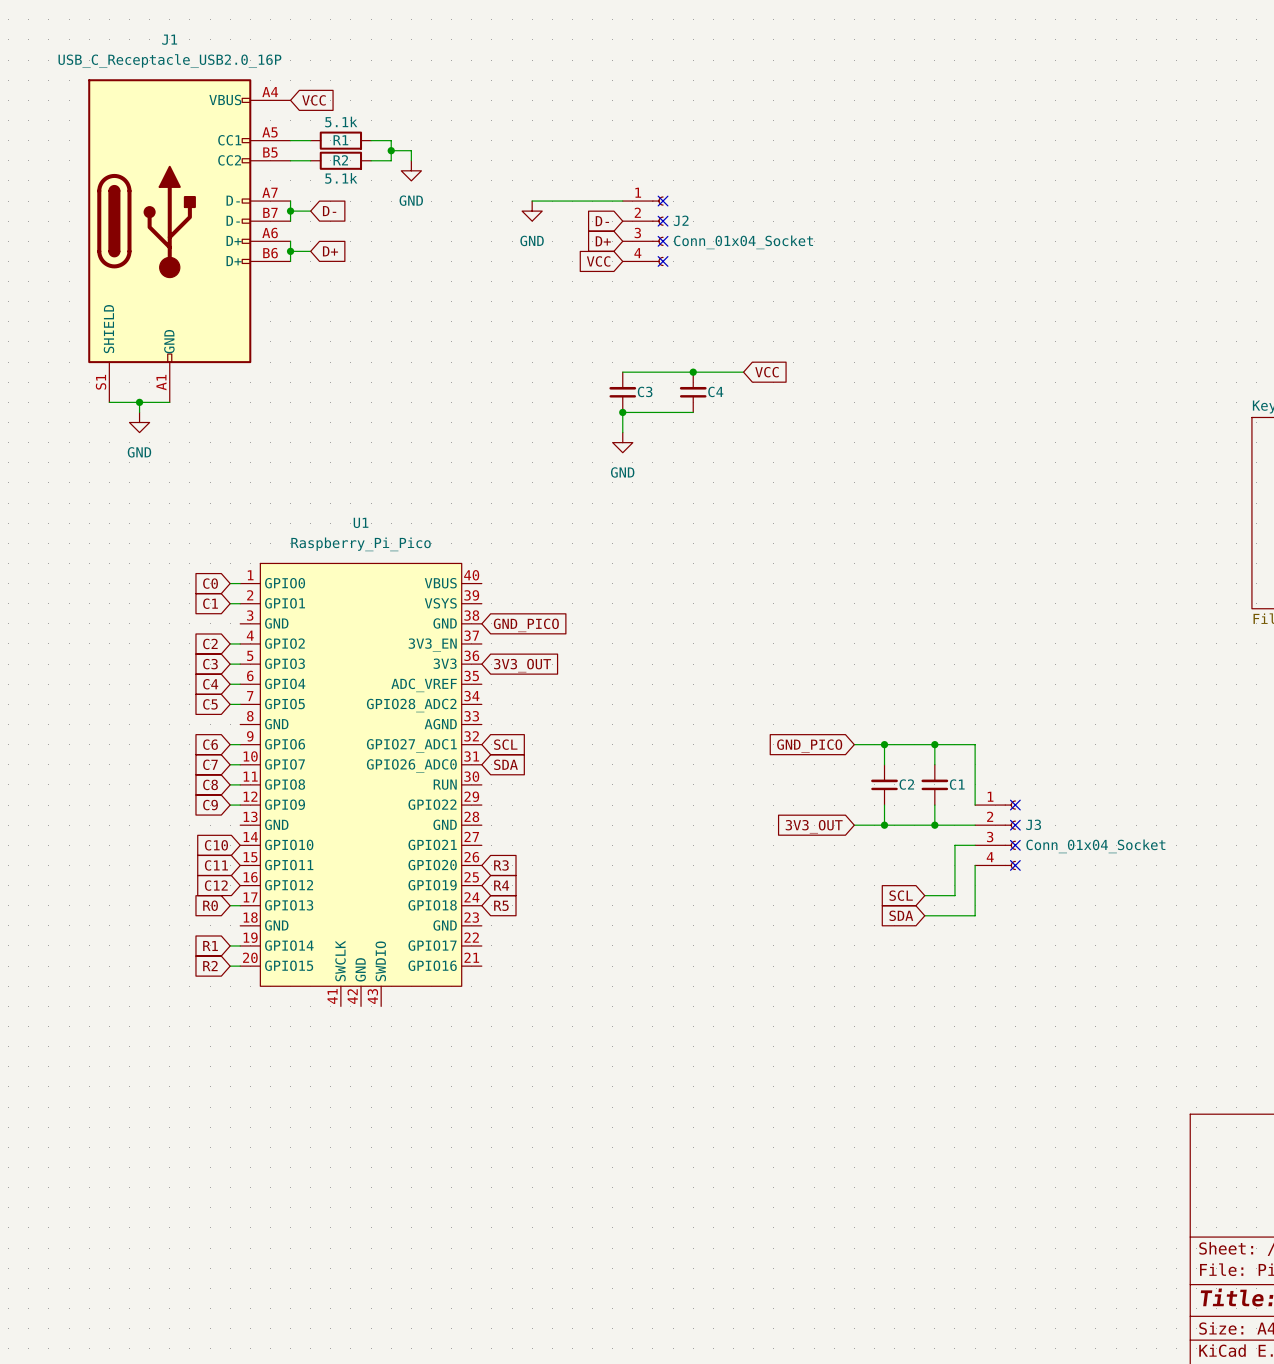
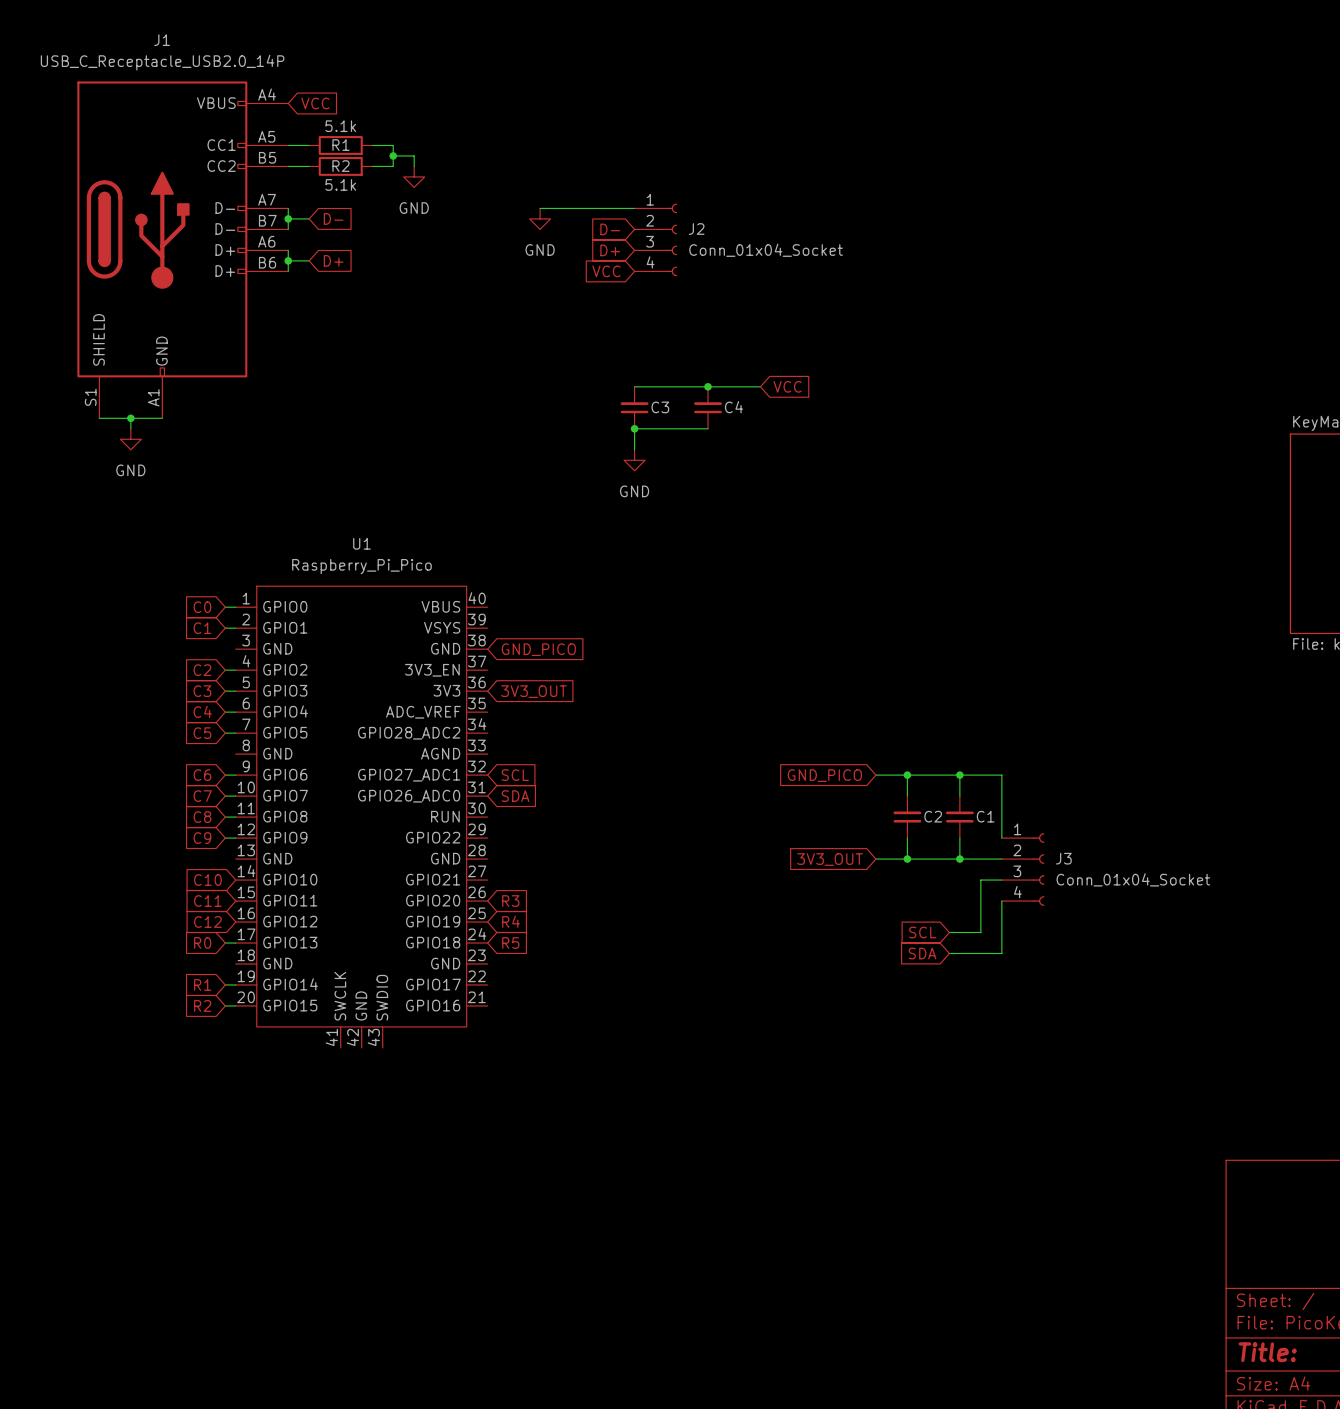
J1 value: USB_C_Receptacle_USB2.0_16P (169, 61) -> USB_C_Receptacle_USB2.0_14P (162, 62)
no-connect mark: (663, 201) -> none
no-connect mark: (663, 221) -> none
no-connect mark: (663, 241) -> none
no-connect mark: (663, 261) -> none
no-connect mark: (1015, 805) -> none
no-connect mark: (1015, 825) -> none
no-connect mark: (1015, 845) -> none
no-connect mark: (1015, 865) -> none

